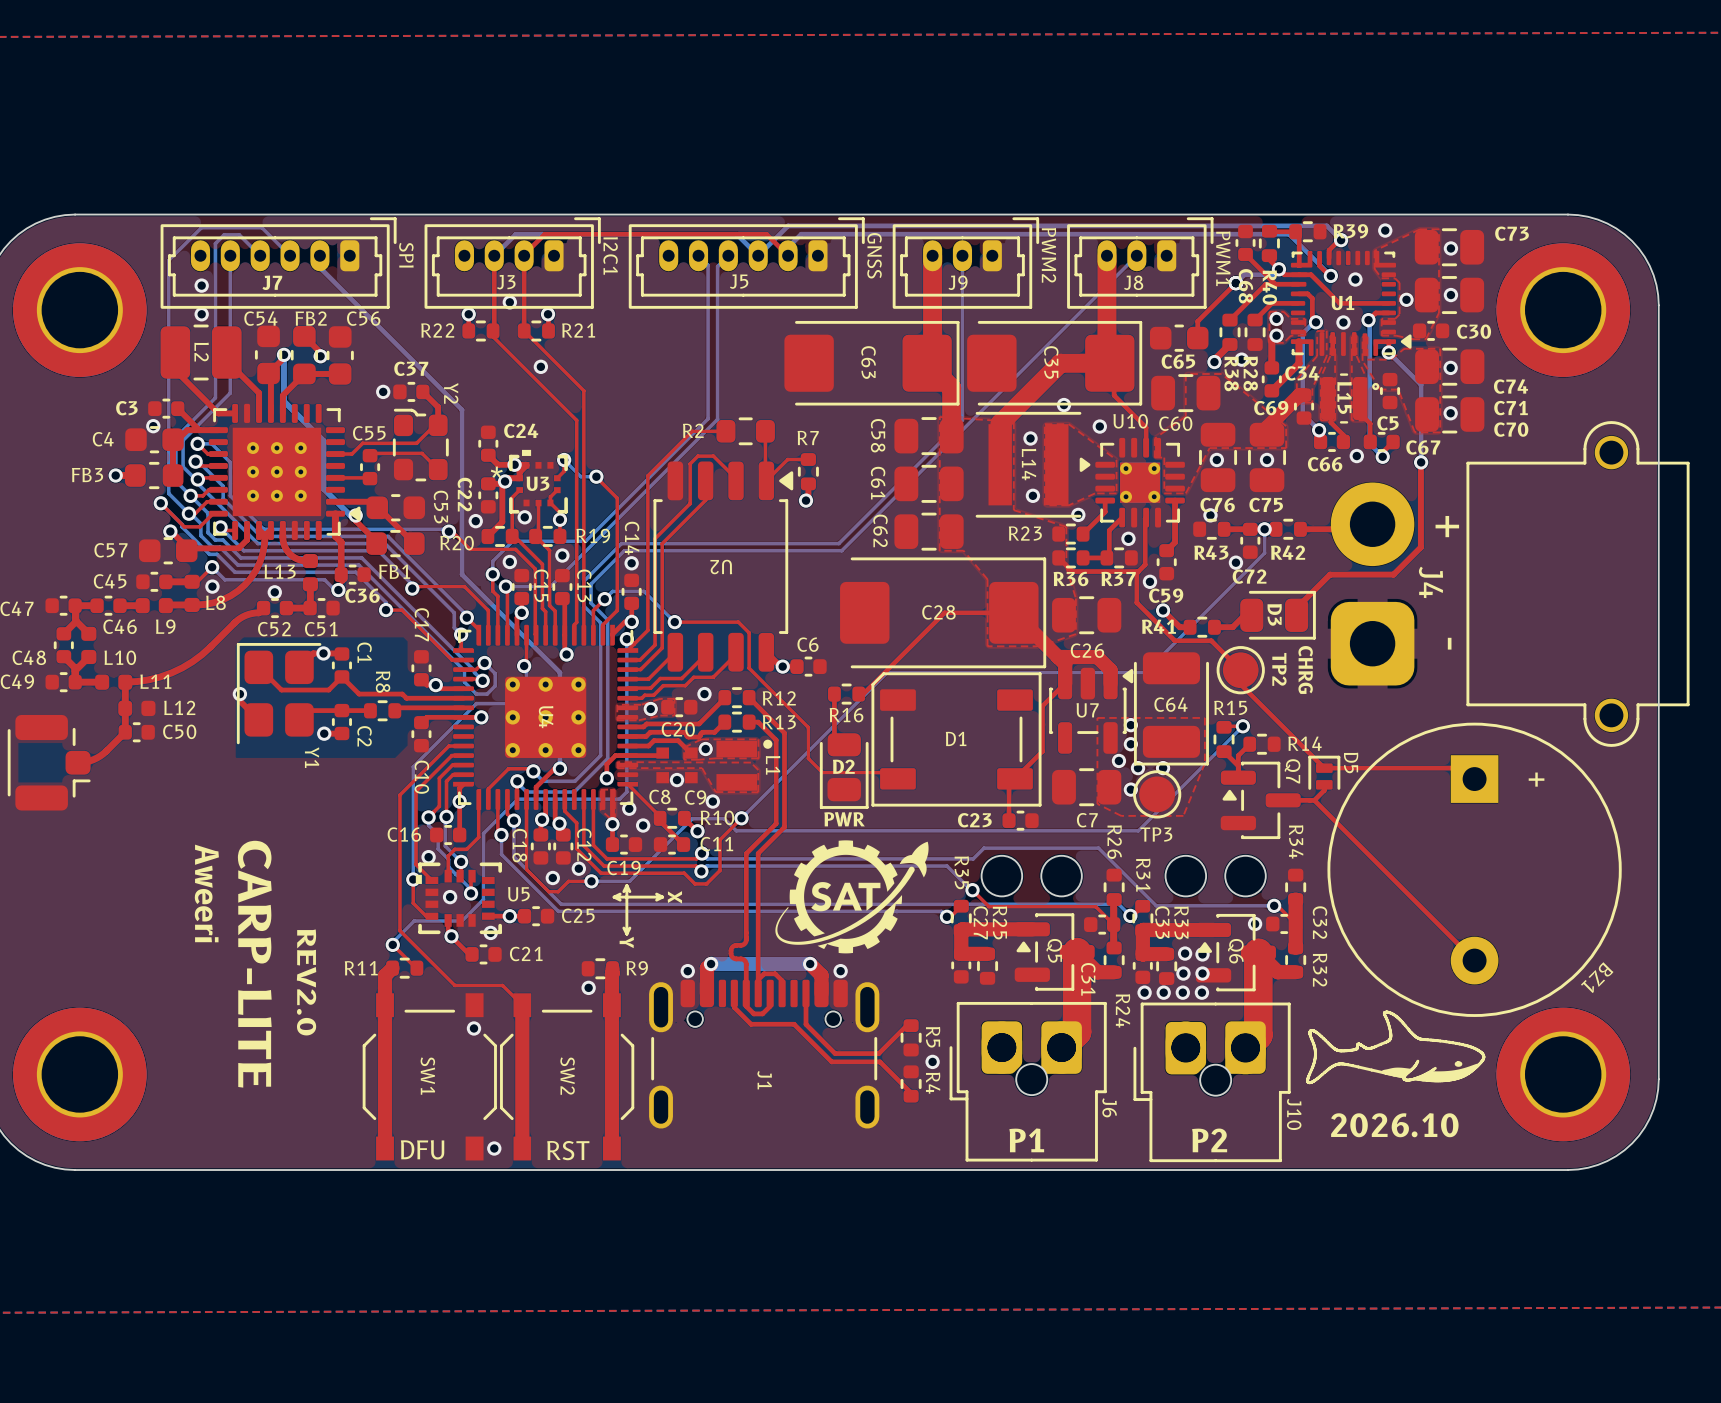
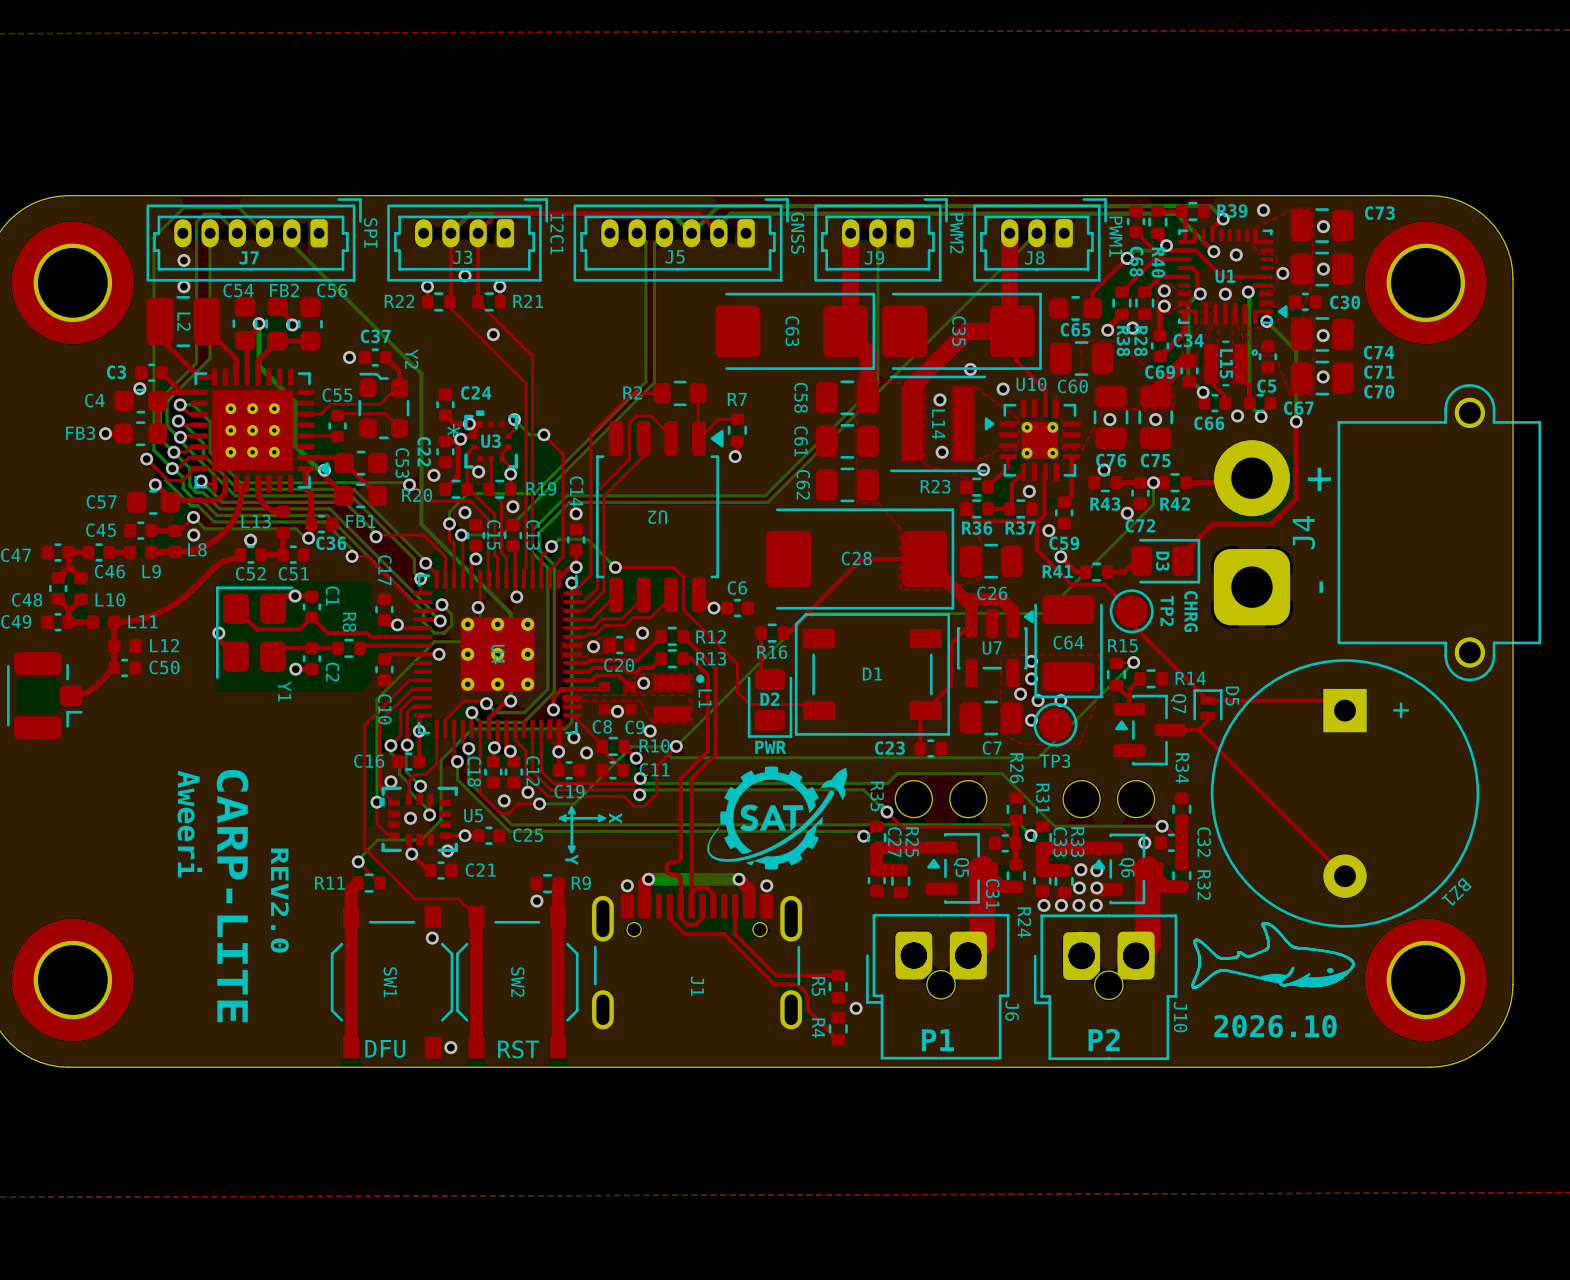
J4 name rotation: 0° (1430, 582) -> 180° (1303, 532)
top track: (806, 1024) (835, 1053) (878, 1053) (906, 1025) (911, 1025) -> (735, 934) (776, 975) (838, 975)
R5 position: (911, 1037) -> (838, 986)
R5 name position: R5 (933, 1037) -> R5 (818, 986)
top track: (831, 1061) (880, 1061) (911, 1092) (911, 1096) -> (758, 968) (774, 984) (794, 984) (802, 989) (807, 997) (807, 1009) (838, 1039)
via position: (932, 1061) -> (856, 1008)
R4 name position: R4 (933, 1083) -> R4 (818, 1028)
R4 position: (911, 1084) -> (838, 1028)

